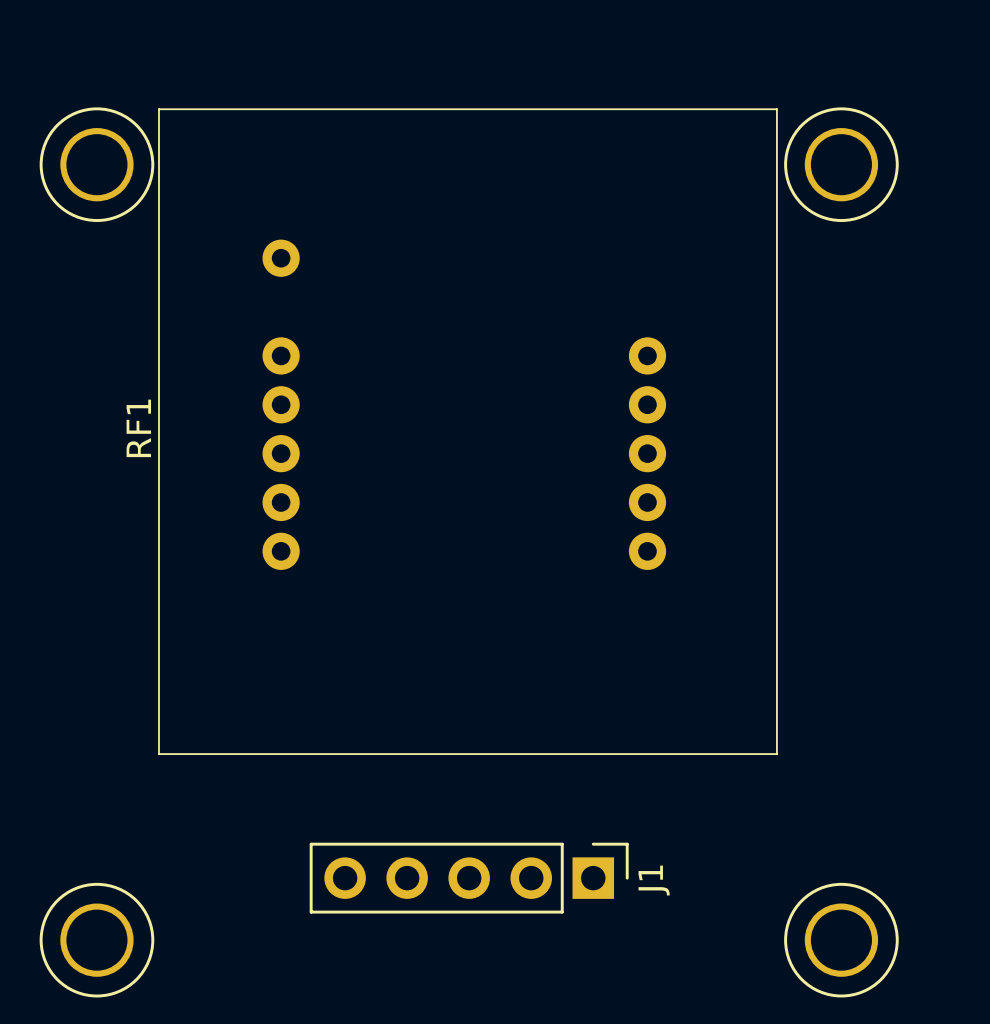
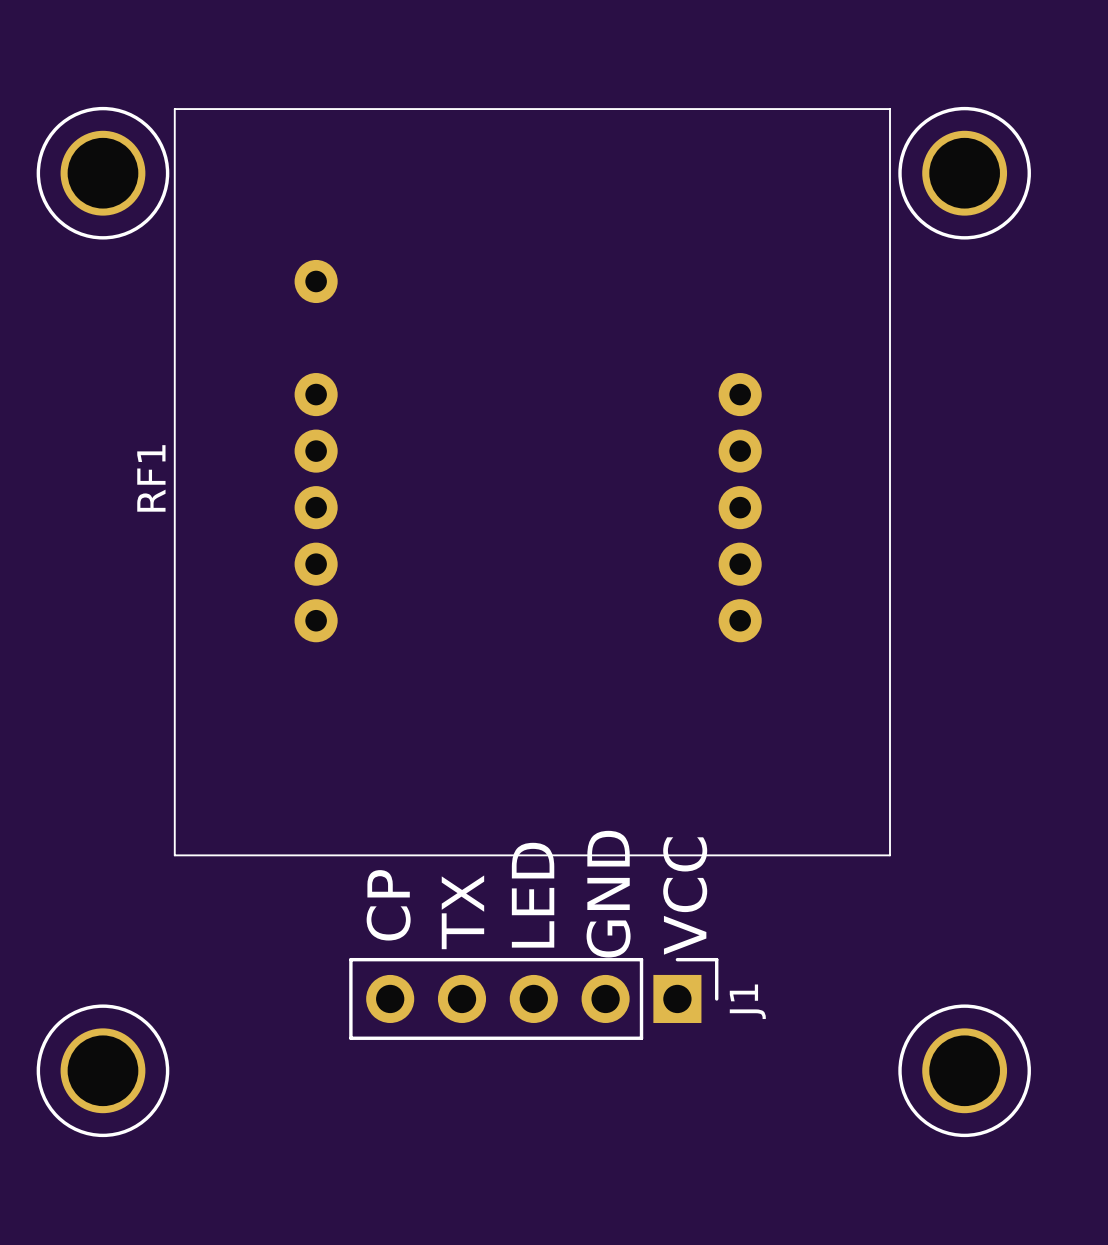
text: none -> GND (608, 894)
text: none -> LED (533, 895)
text: none -> VCC (685, 896)
text: none -> CP (388, 905)
text: none -> TX (462, 912)

